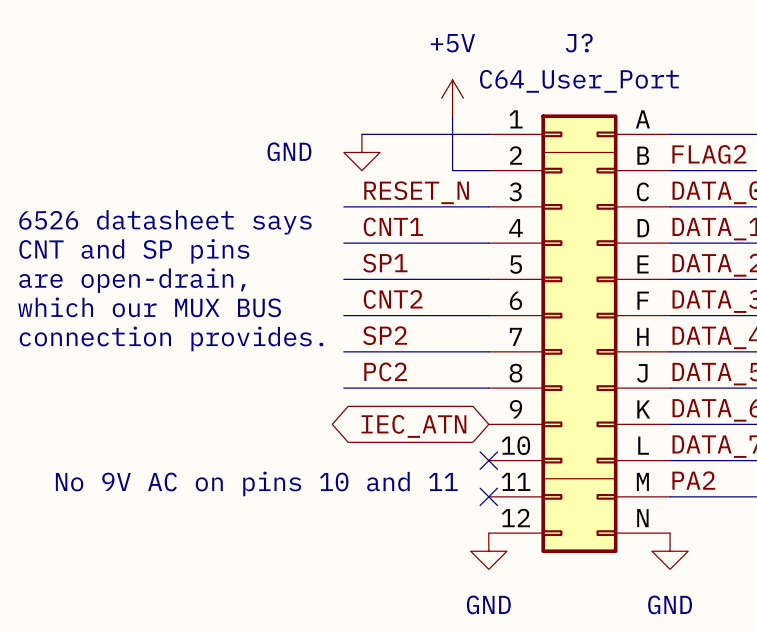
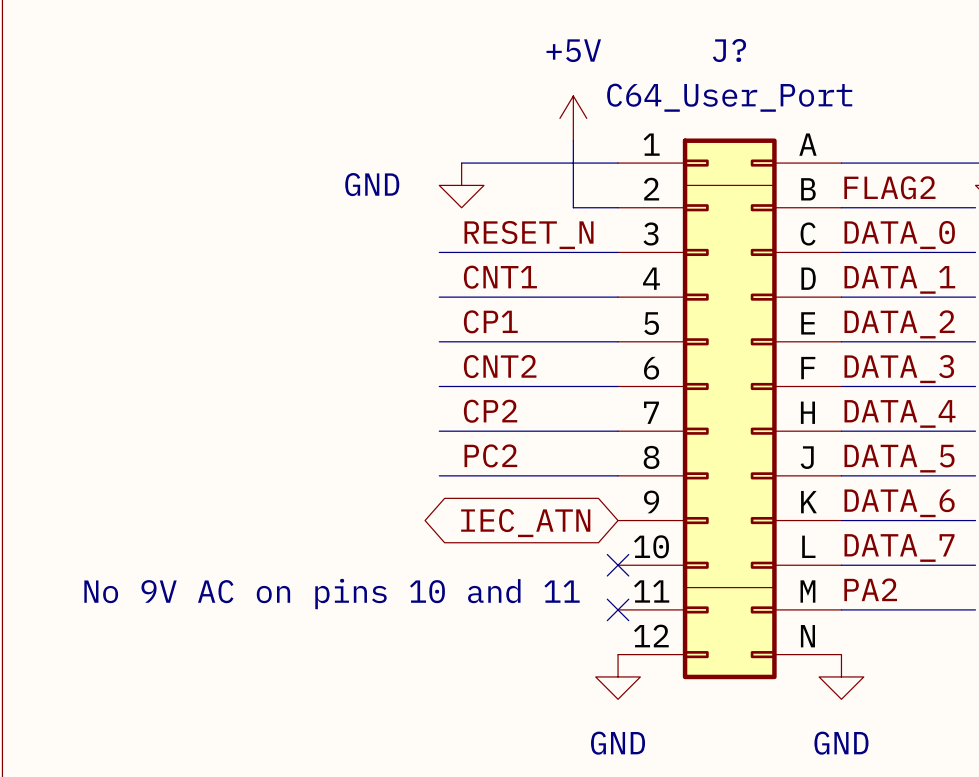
text: 6526 datasheet says (165, 222) -> none
text: CNT and SP pins (134, 251) -> none
label: SP1 (385, 263) -> CP1 (490, 321)
text: are open-drain, (132, 280) -> none
text: which our MUX BUS (149, 307) -> none
label: SP2 (385, 335) -> CP2 (490, 411)
text: connection provides. (171, 338) -> none

